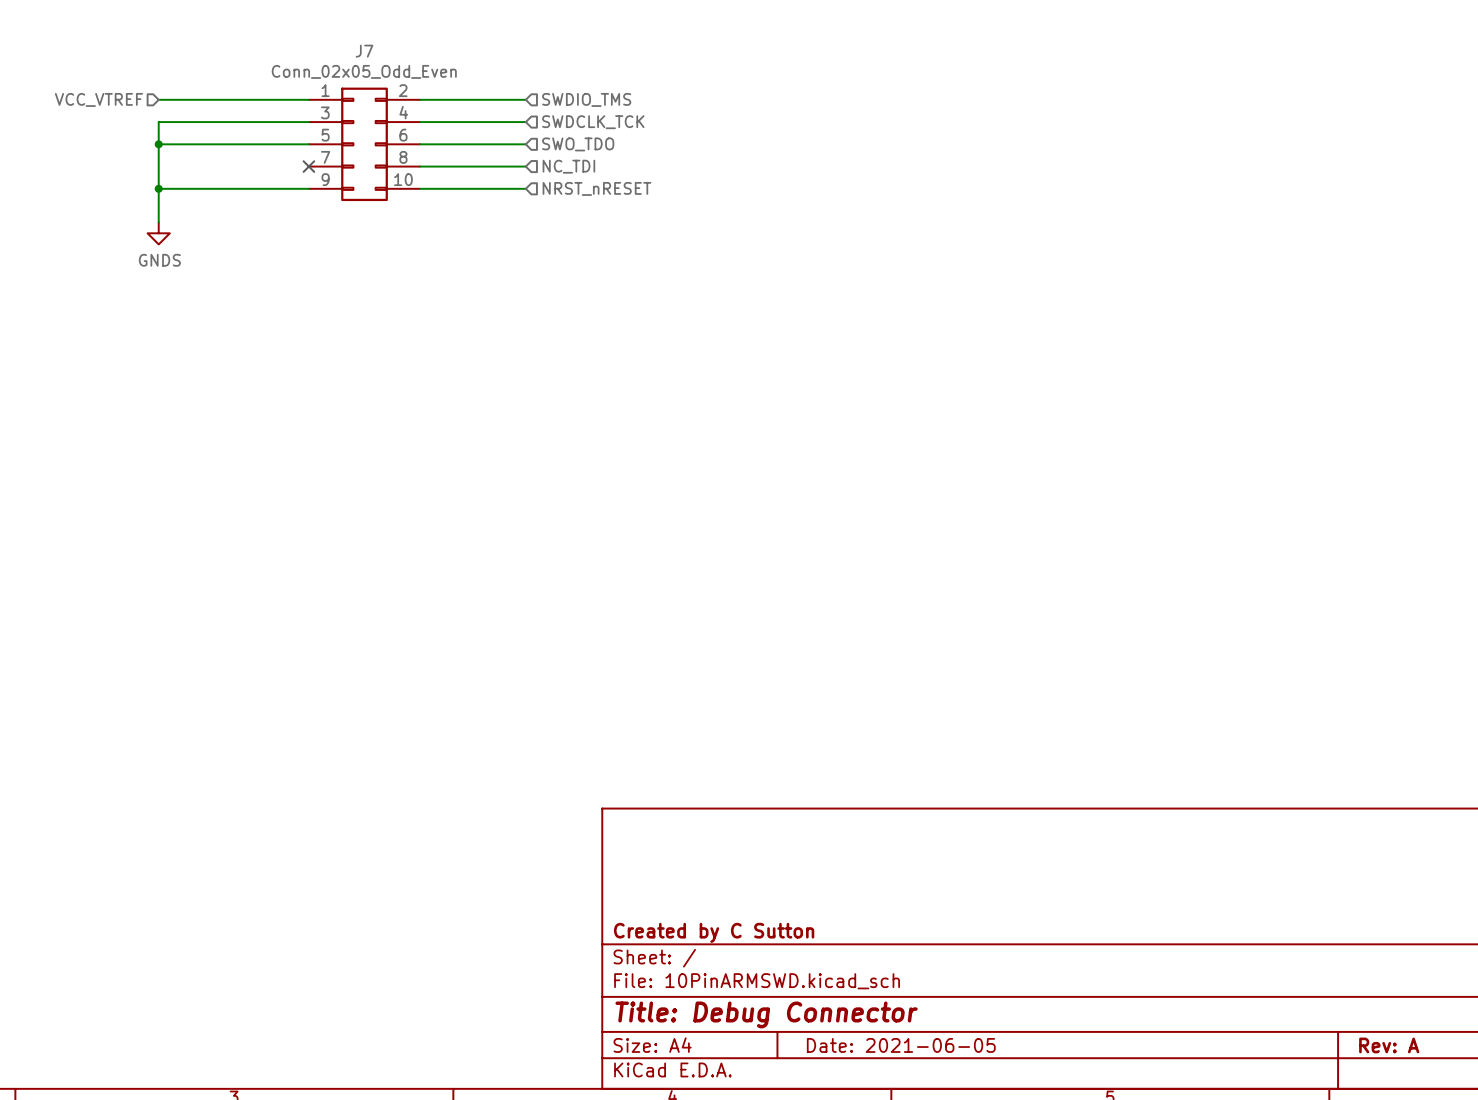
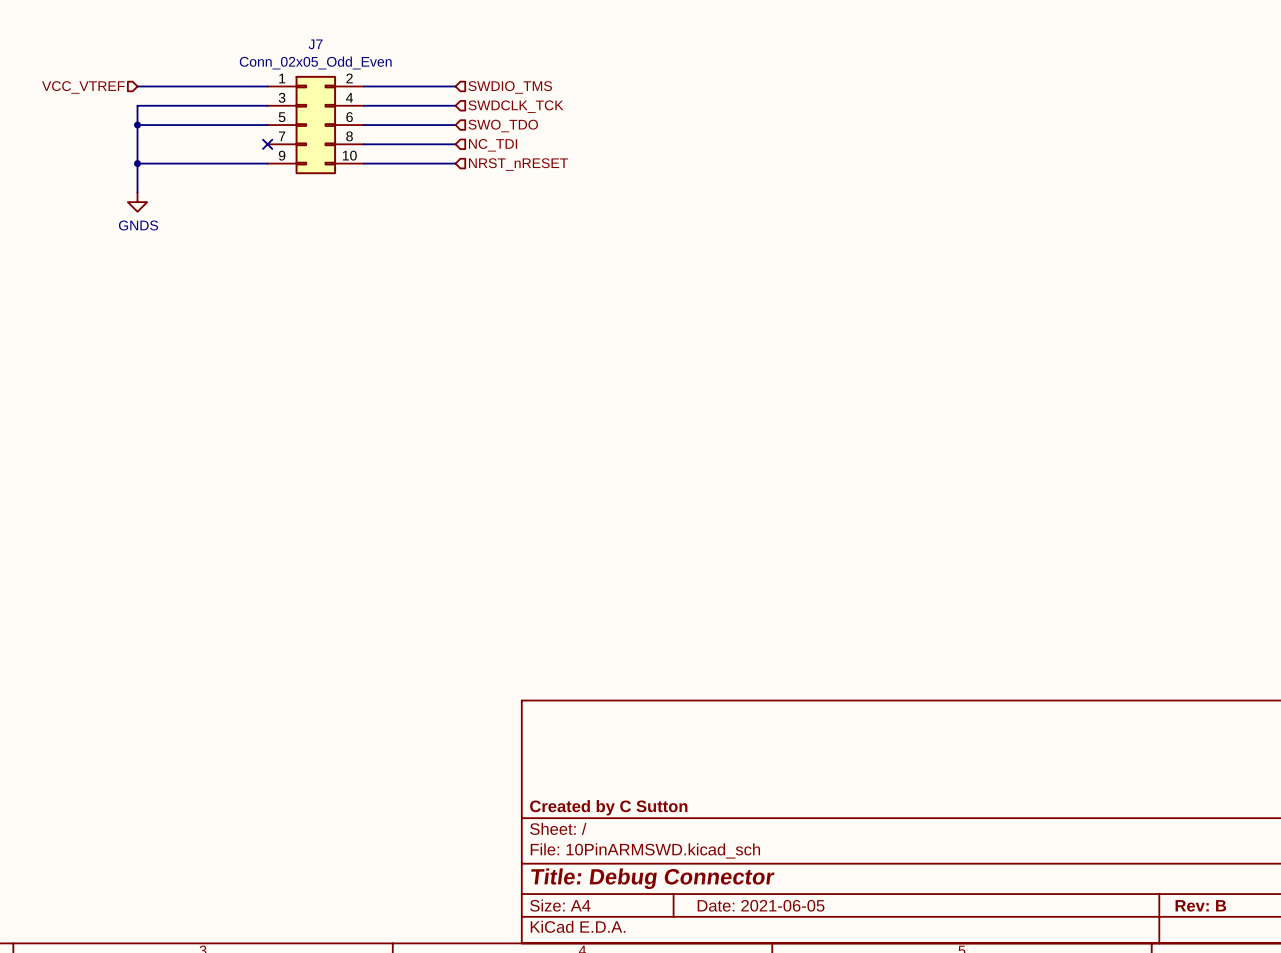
title block: Rev: A (1389, 1045) -> Rev: B (1200, 905)

